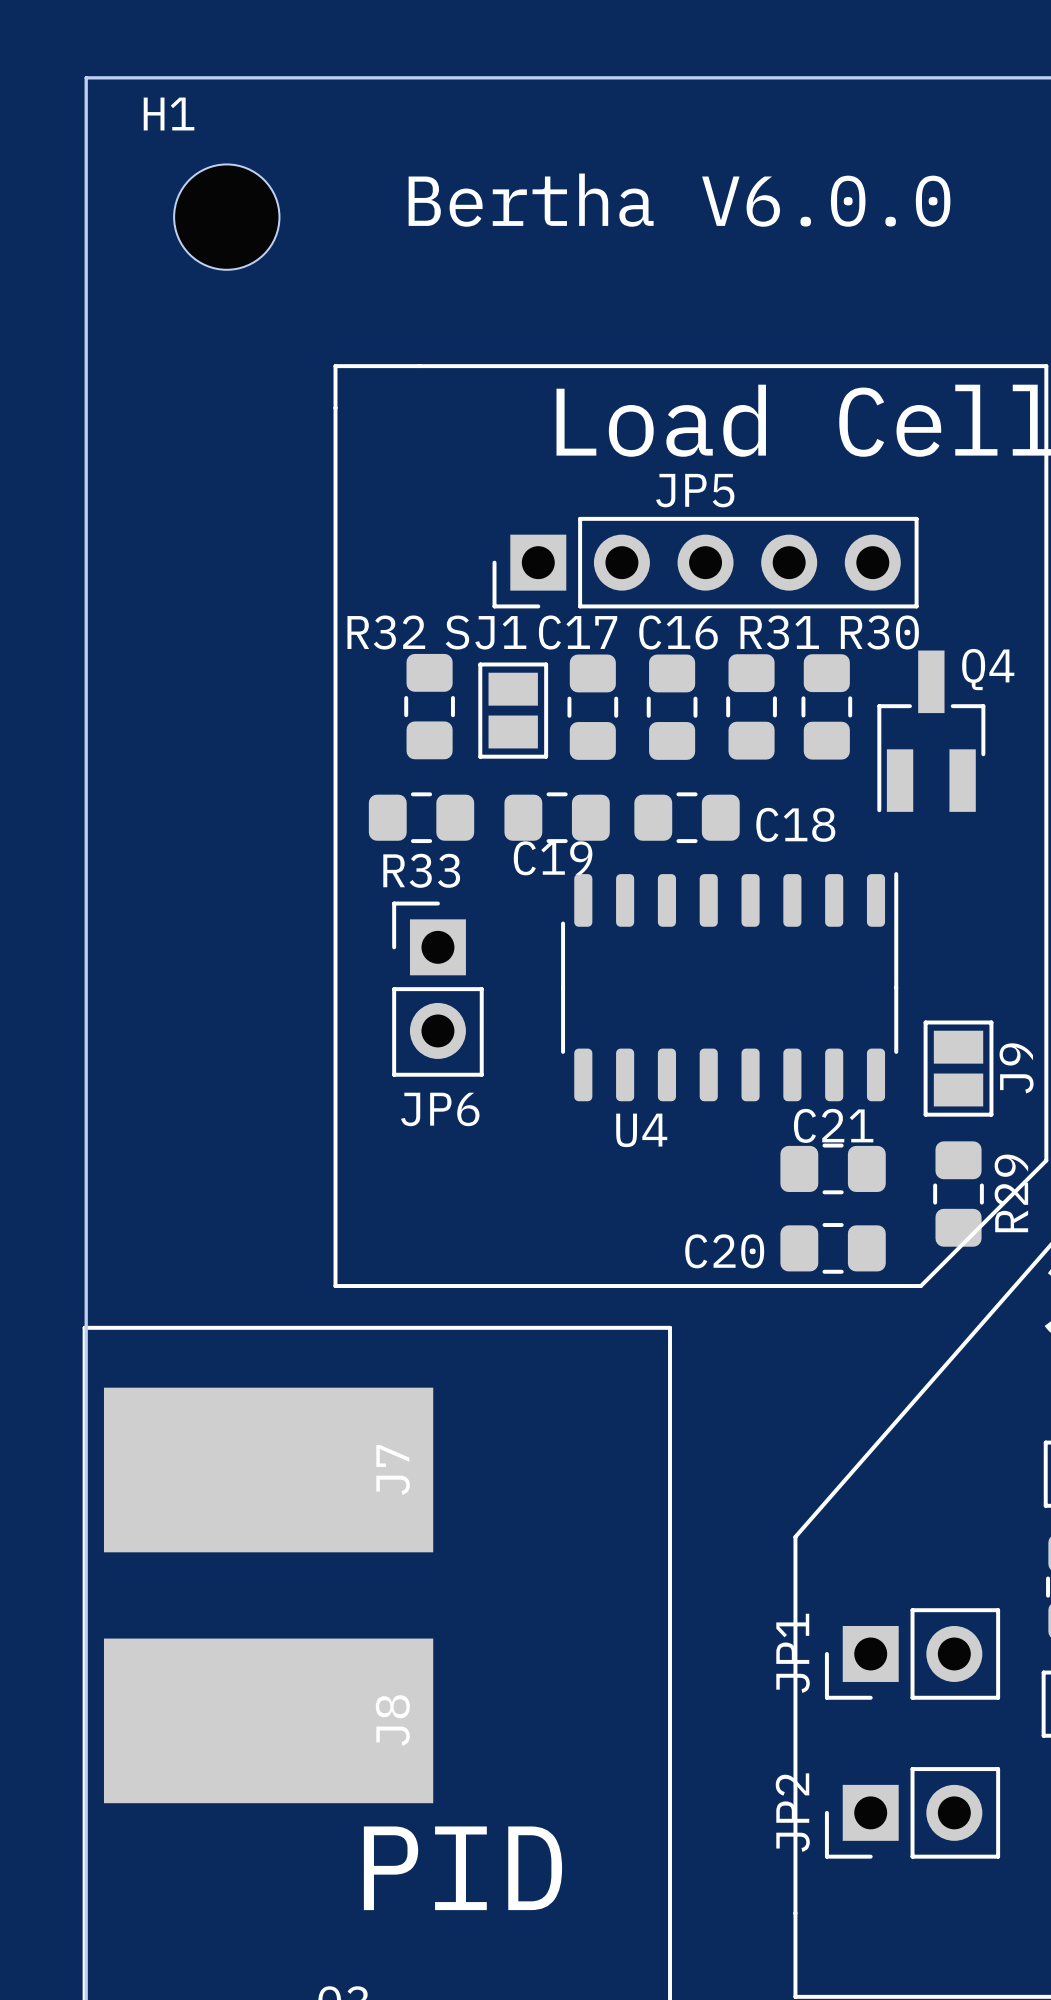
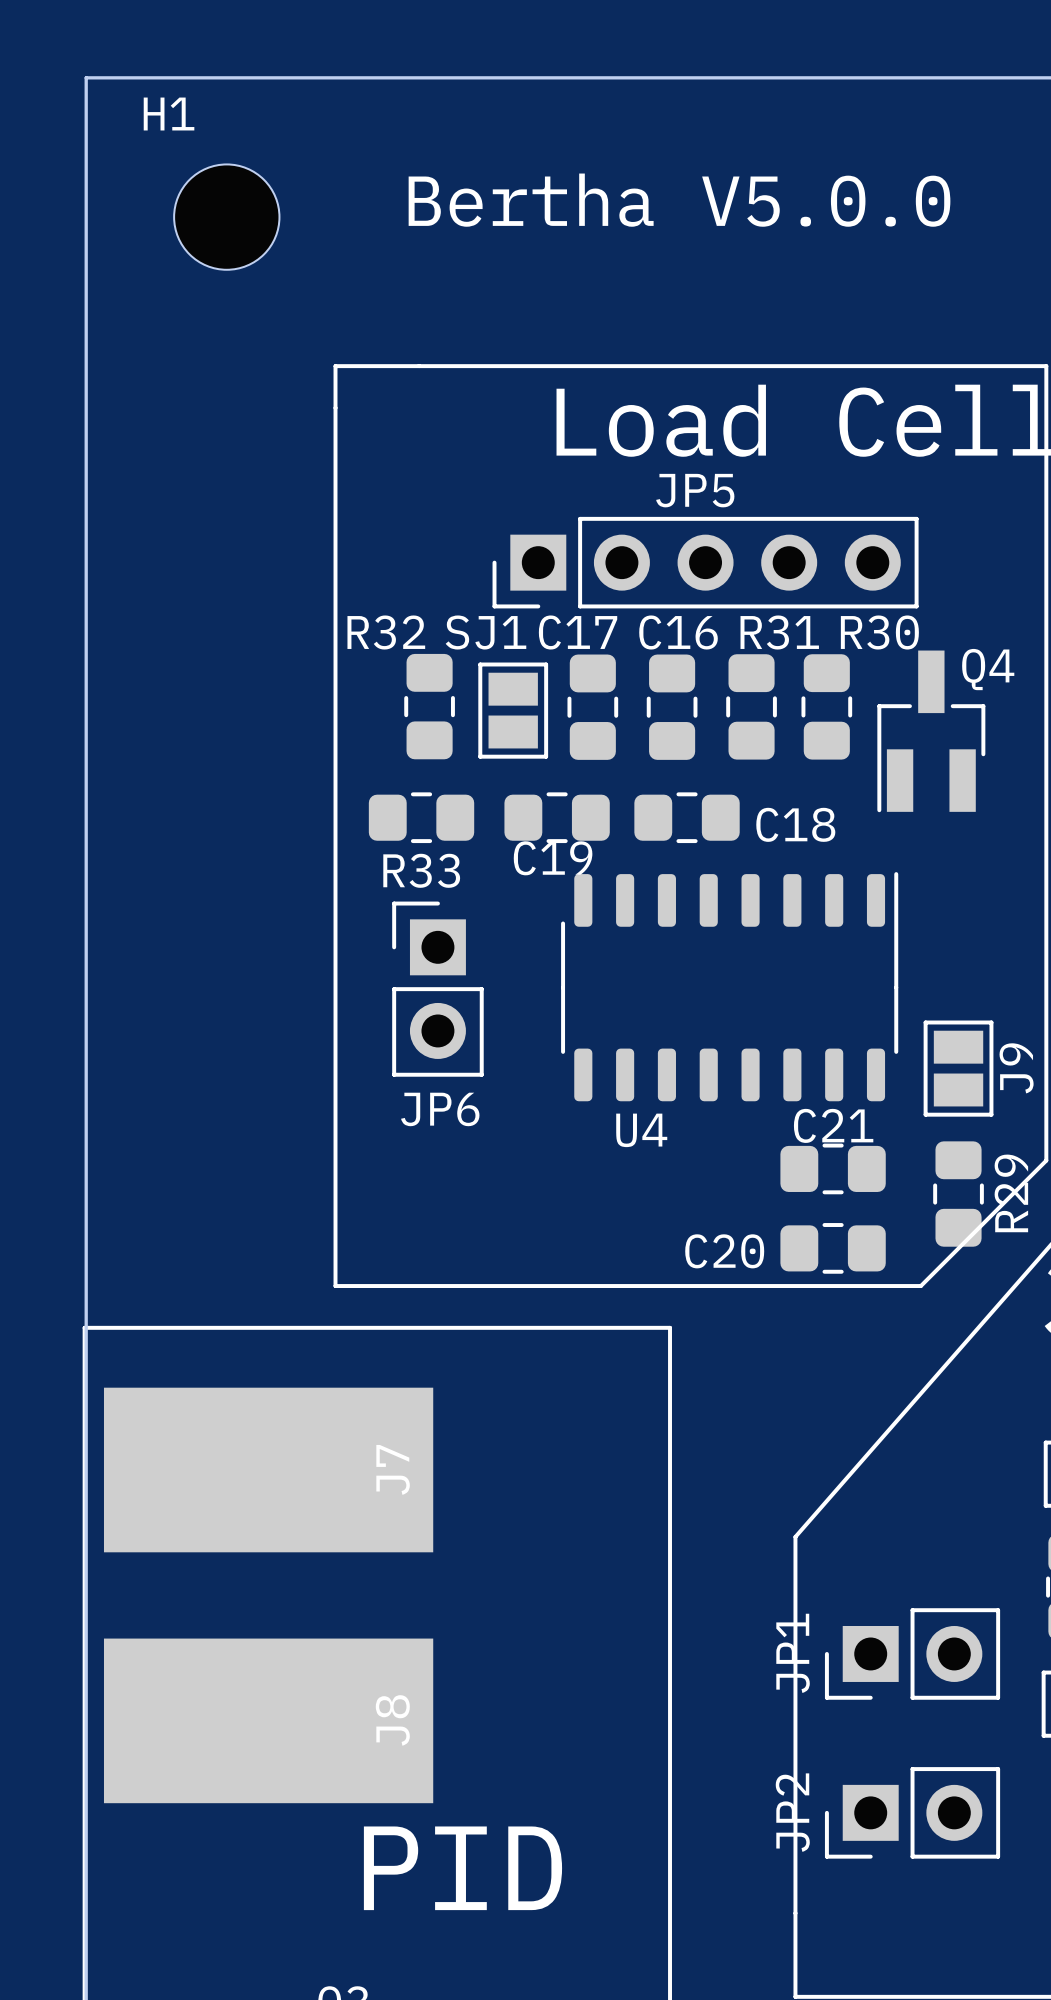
text: Bertha V6.0.0 (679, 200) -> Bertha V5.0.0 (679, 200)

